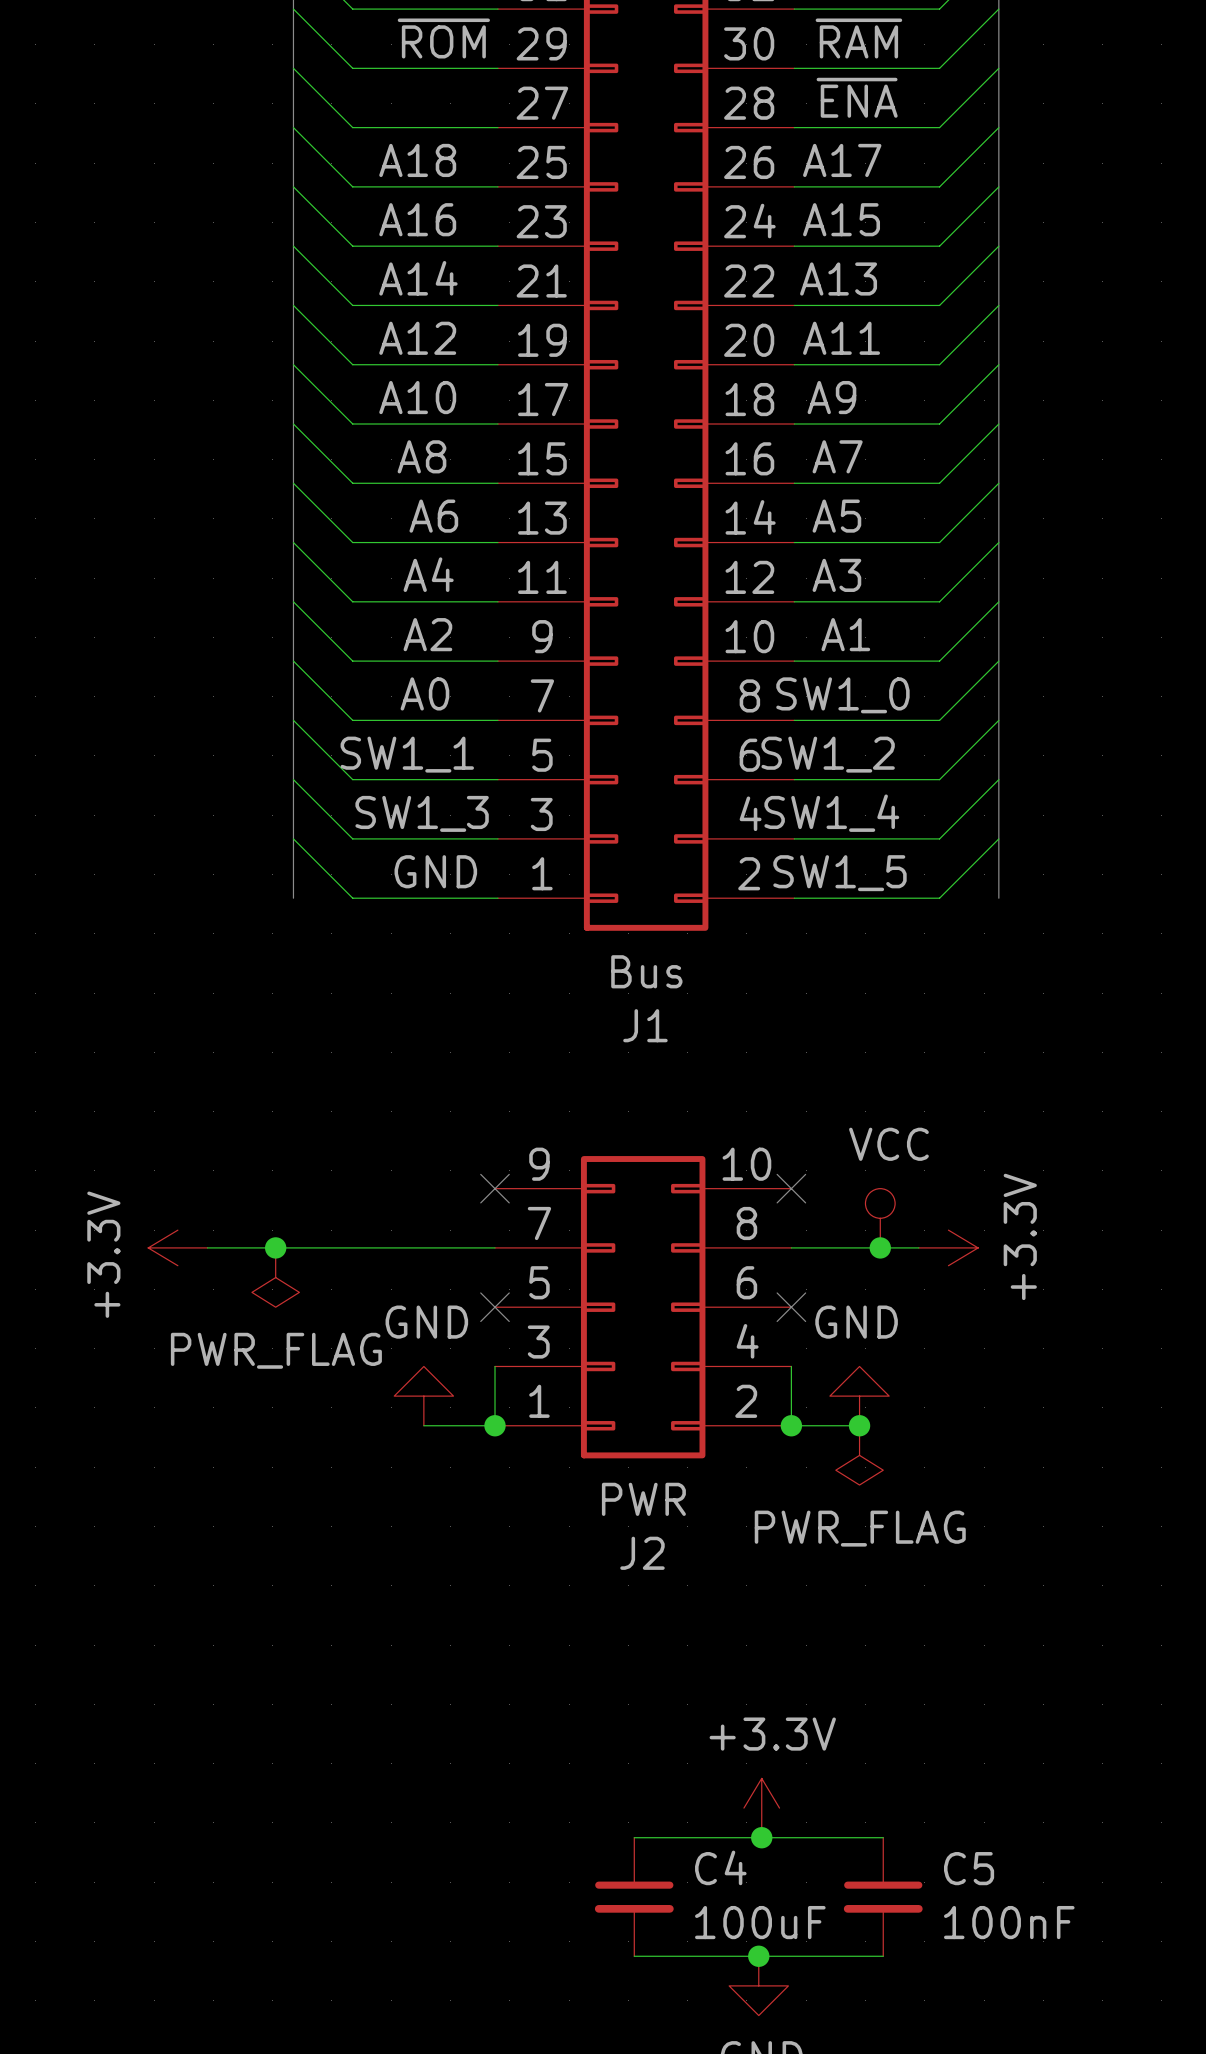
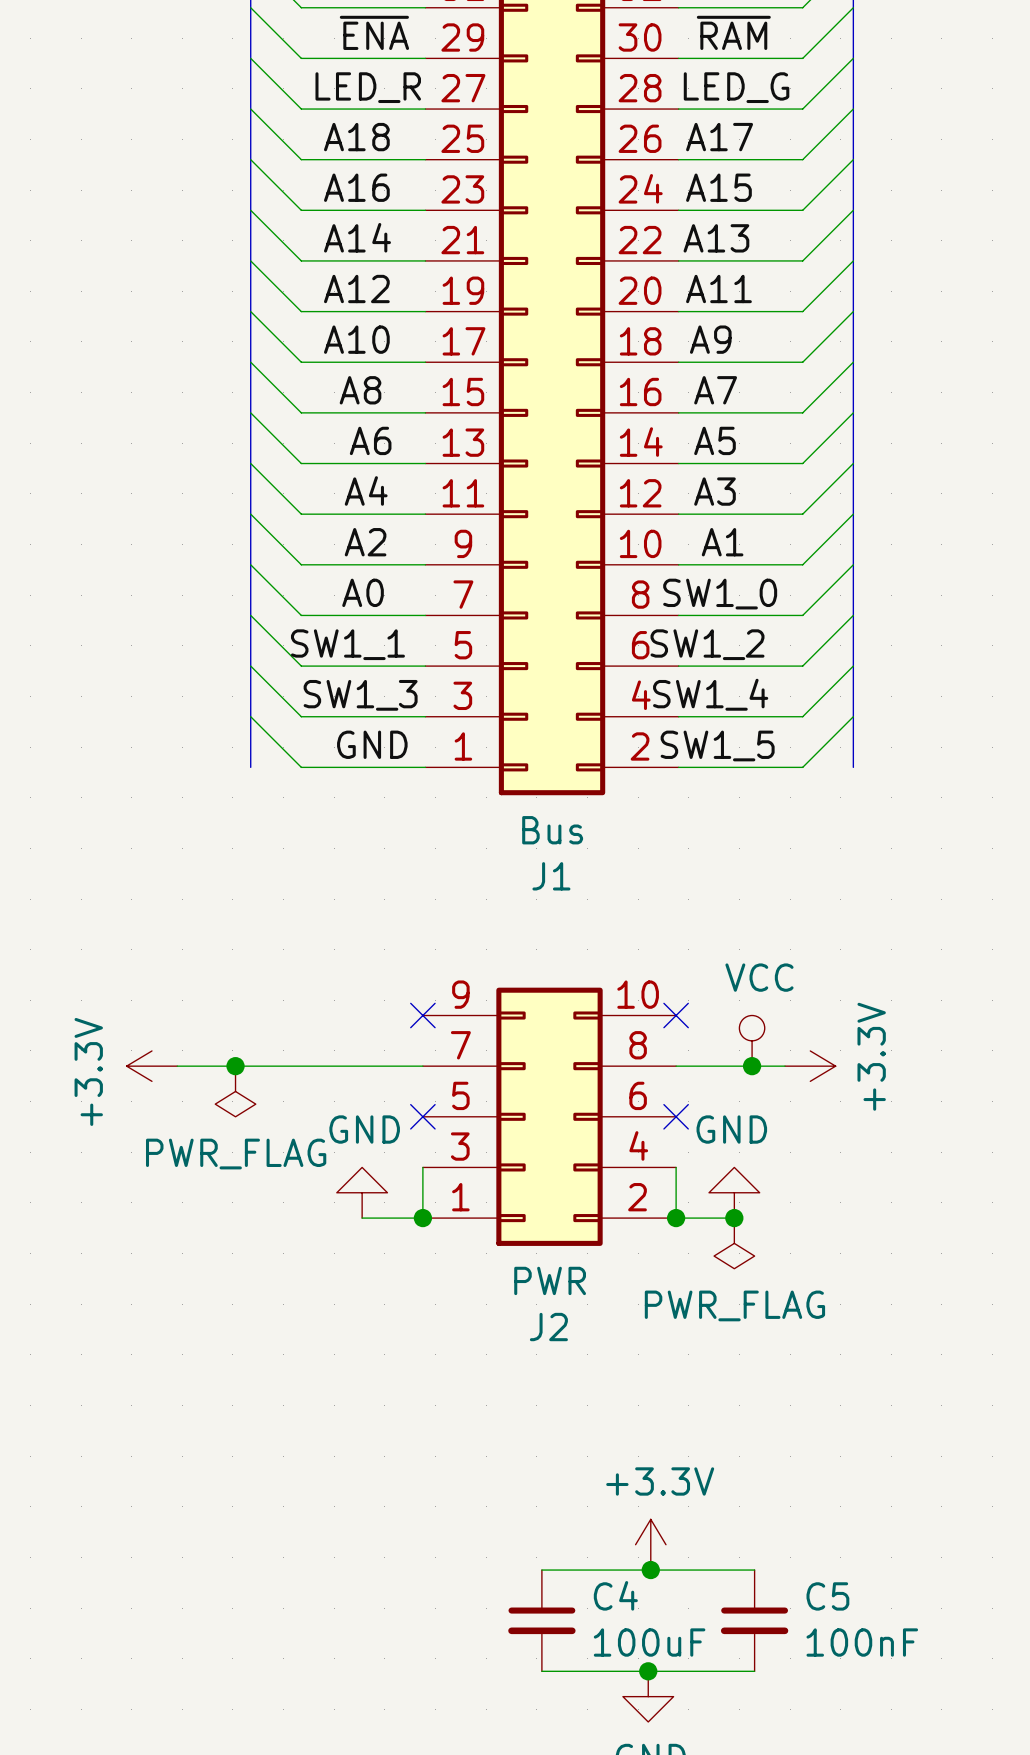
label: ~{ROM} (443, 38) -> ~{ENA} (374, 32)
label: ~{ENA} (857, 97) -> none
label: none -> LED_R (368, 87)
label: none -> LED_G (736, 87)

